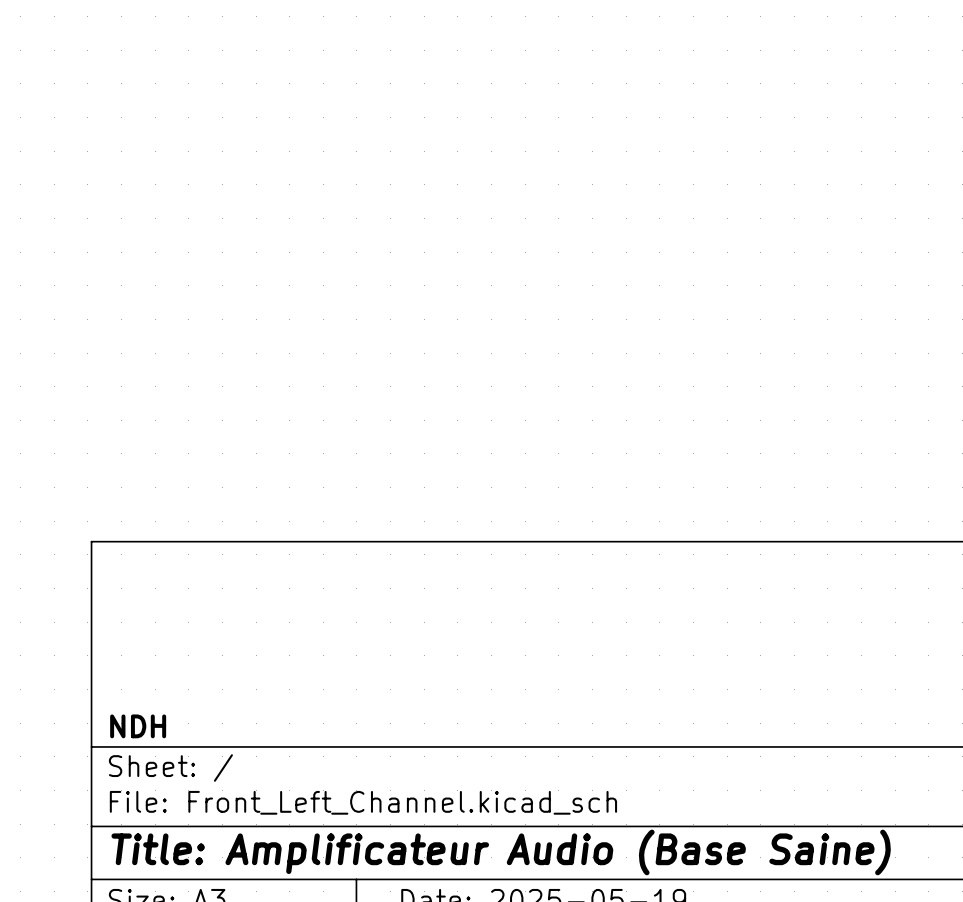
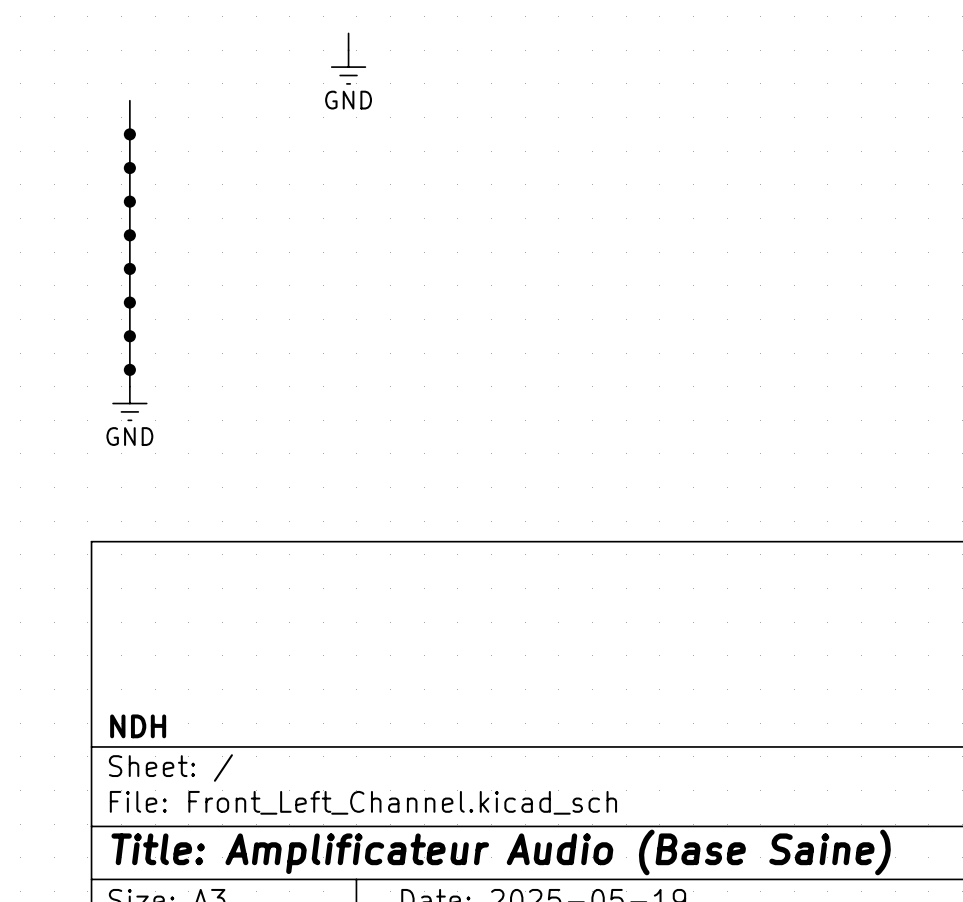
wire: none -> (348, 33) (348, 50)
power symbol: none -> GND (348, 67)
wire: none -> (129, 100) (129, 386)
junction: none -> (129, 134)
junction: none -> (129, 168)
junction: none -> (129, 201)
junction: none -> (129, 235)
junction: none -> (129, 268)
junction: none -> (129, 302)
junction: none -> (129, 336)
junction: none -> (129, 369)
power symbol: none -> GND (129, 403)

